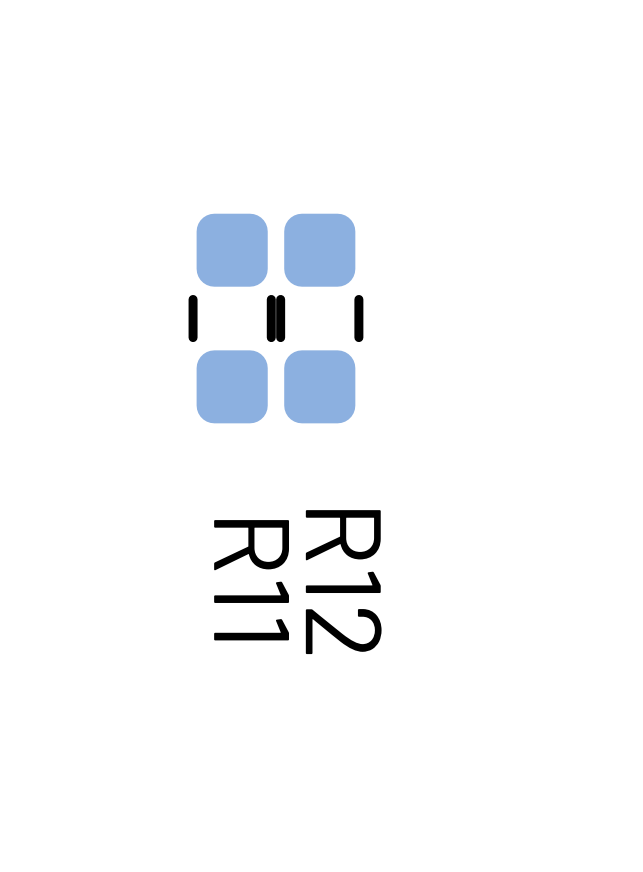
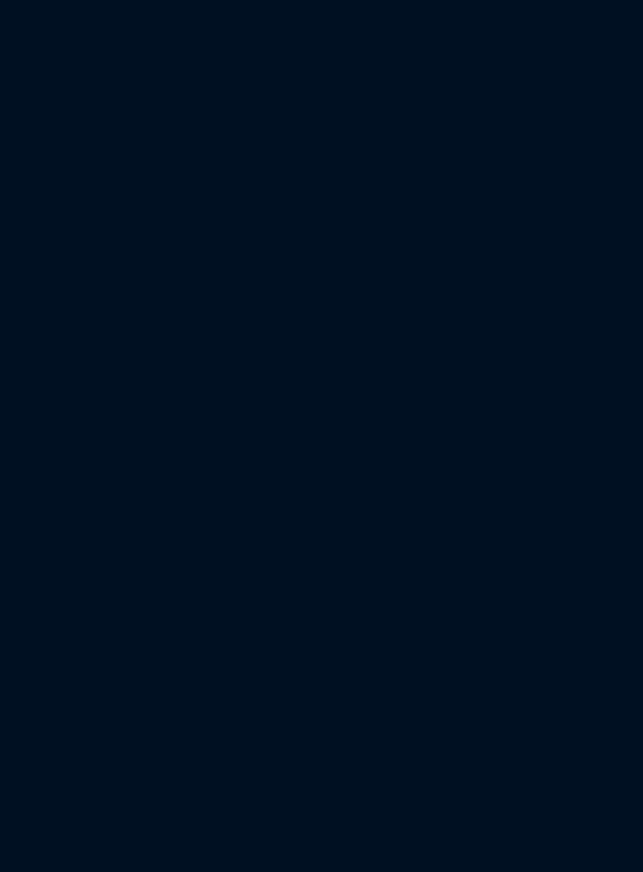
R11: (232, 318) -> none
R12: (319, 318) -> none

